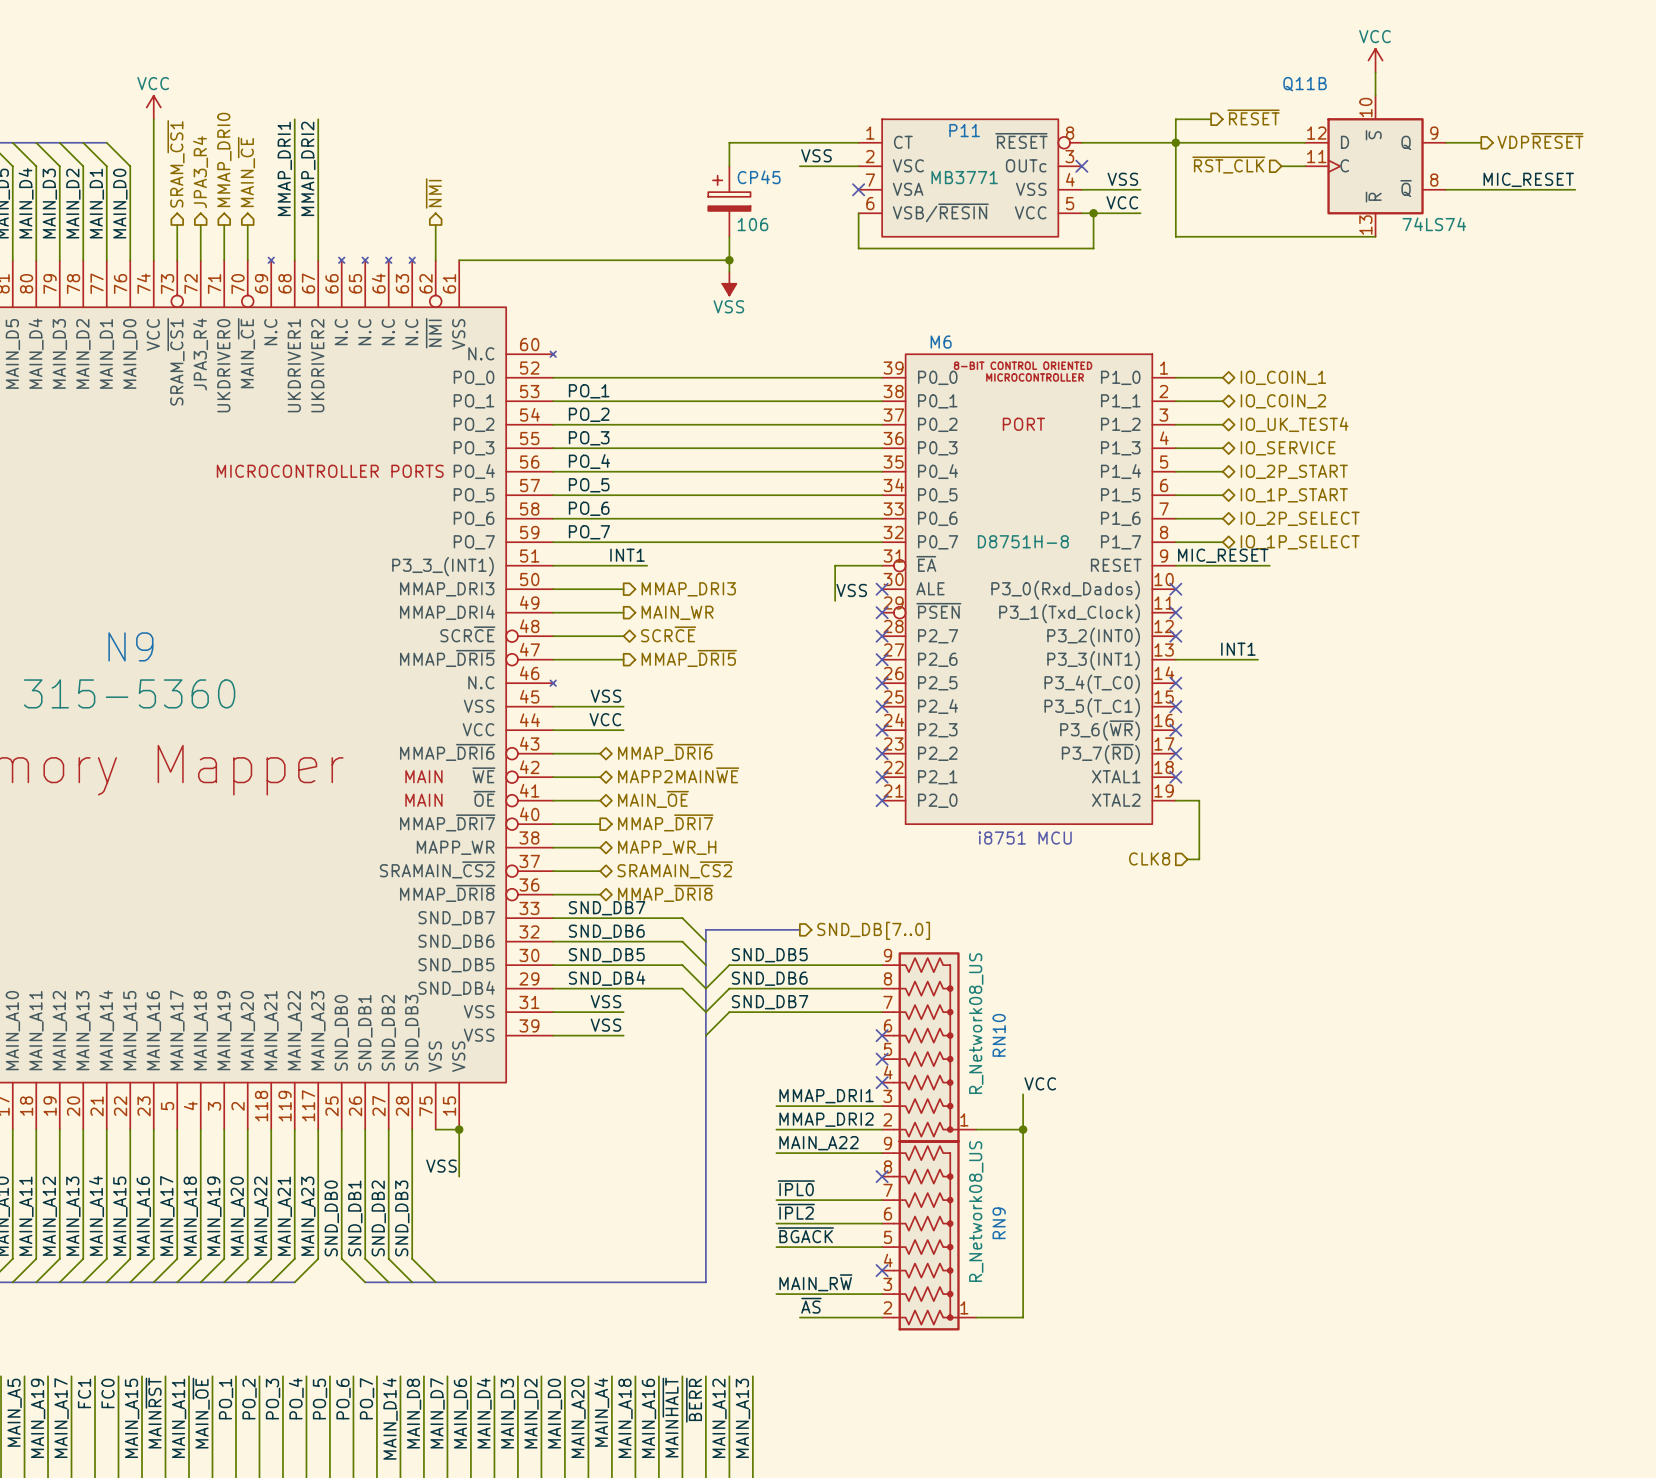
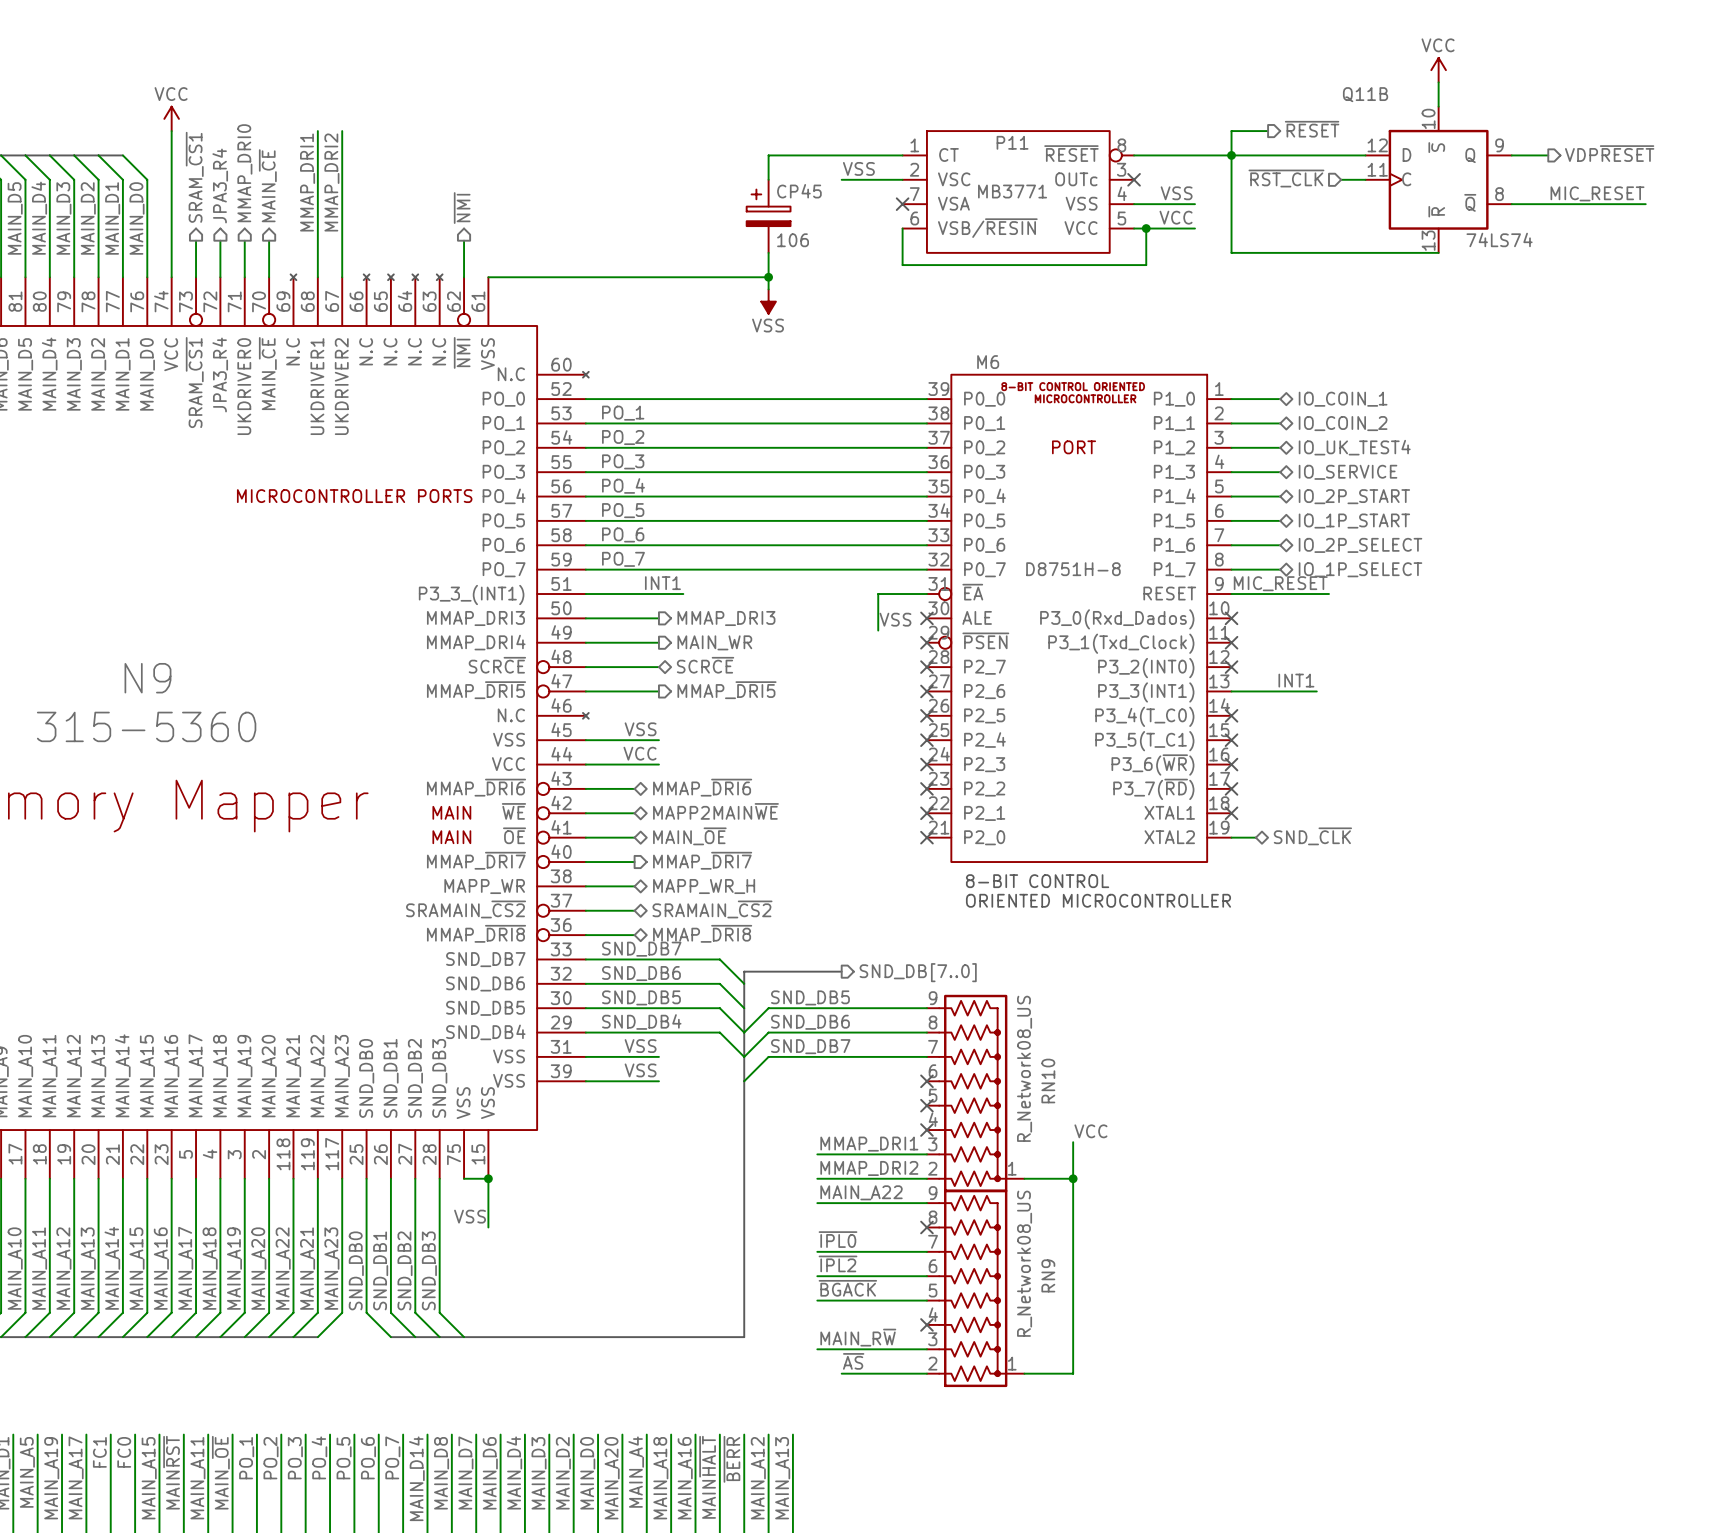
hierarchical label: none -> SND_~{CLK} (1312, 836)
wire: (1199, 800) (1199, 859) (1187, 859) -> none
text: i8751 MCU (1025, 838) -> none
text: none -> 8-BIT CONTROL (1037, 881)
hierarchical label: CLK8 (1149, 858) -> none
text: none -> ORIENTED MICROCONTROLLER (1098, 900)

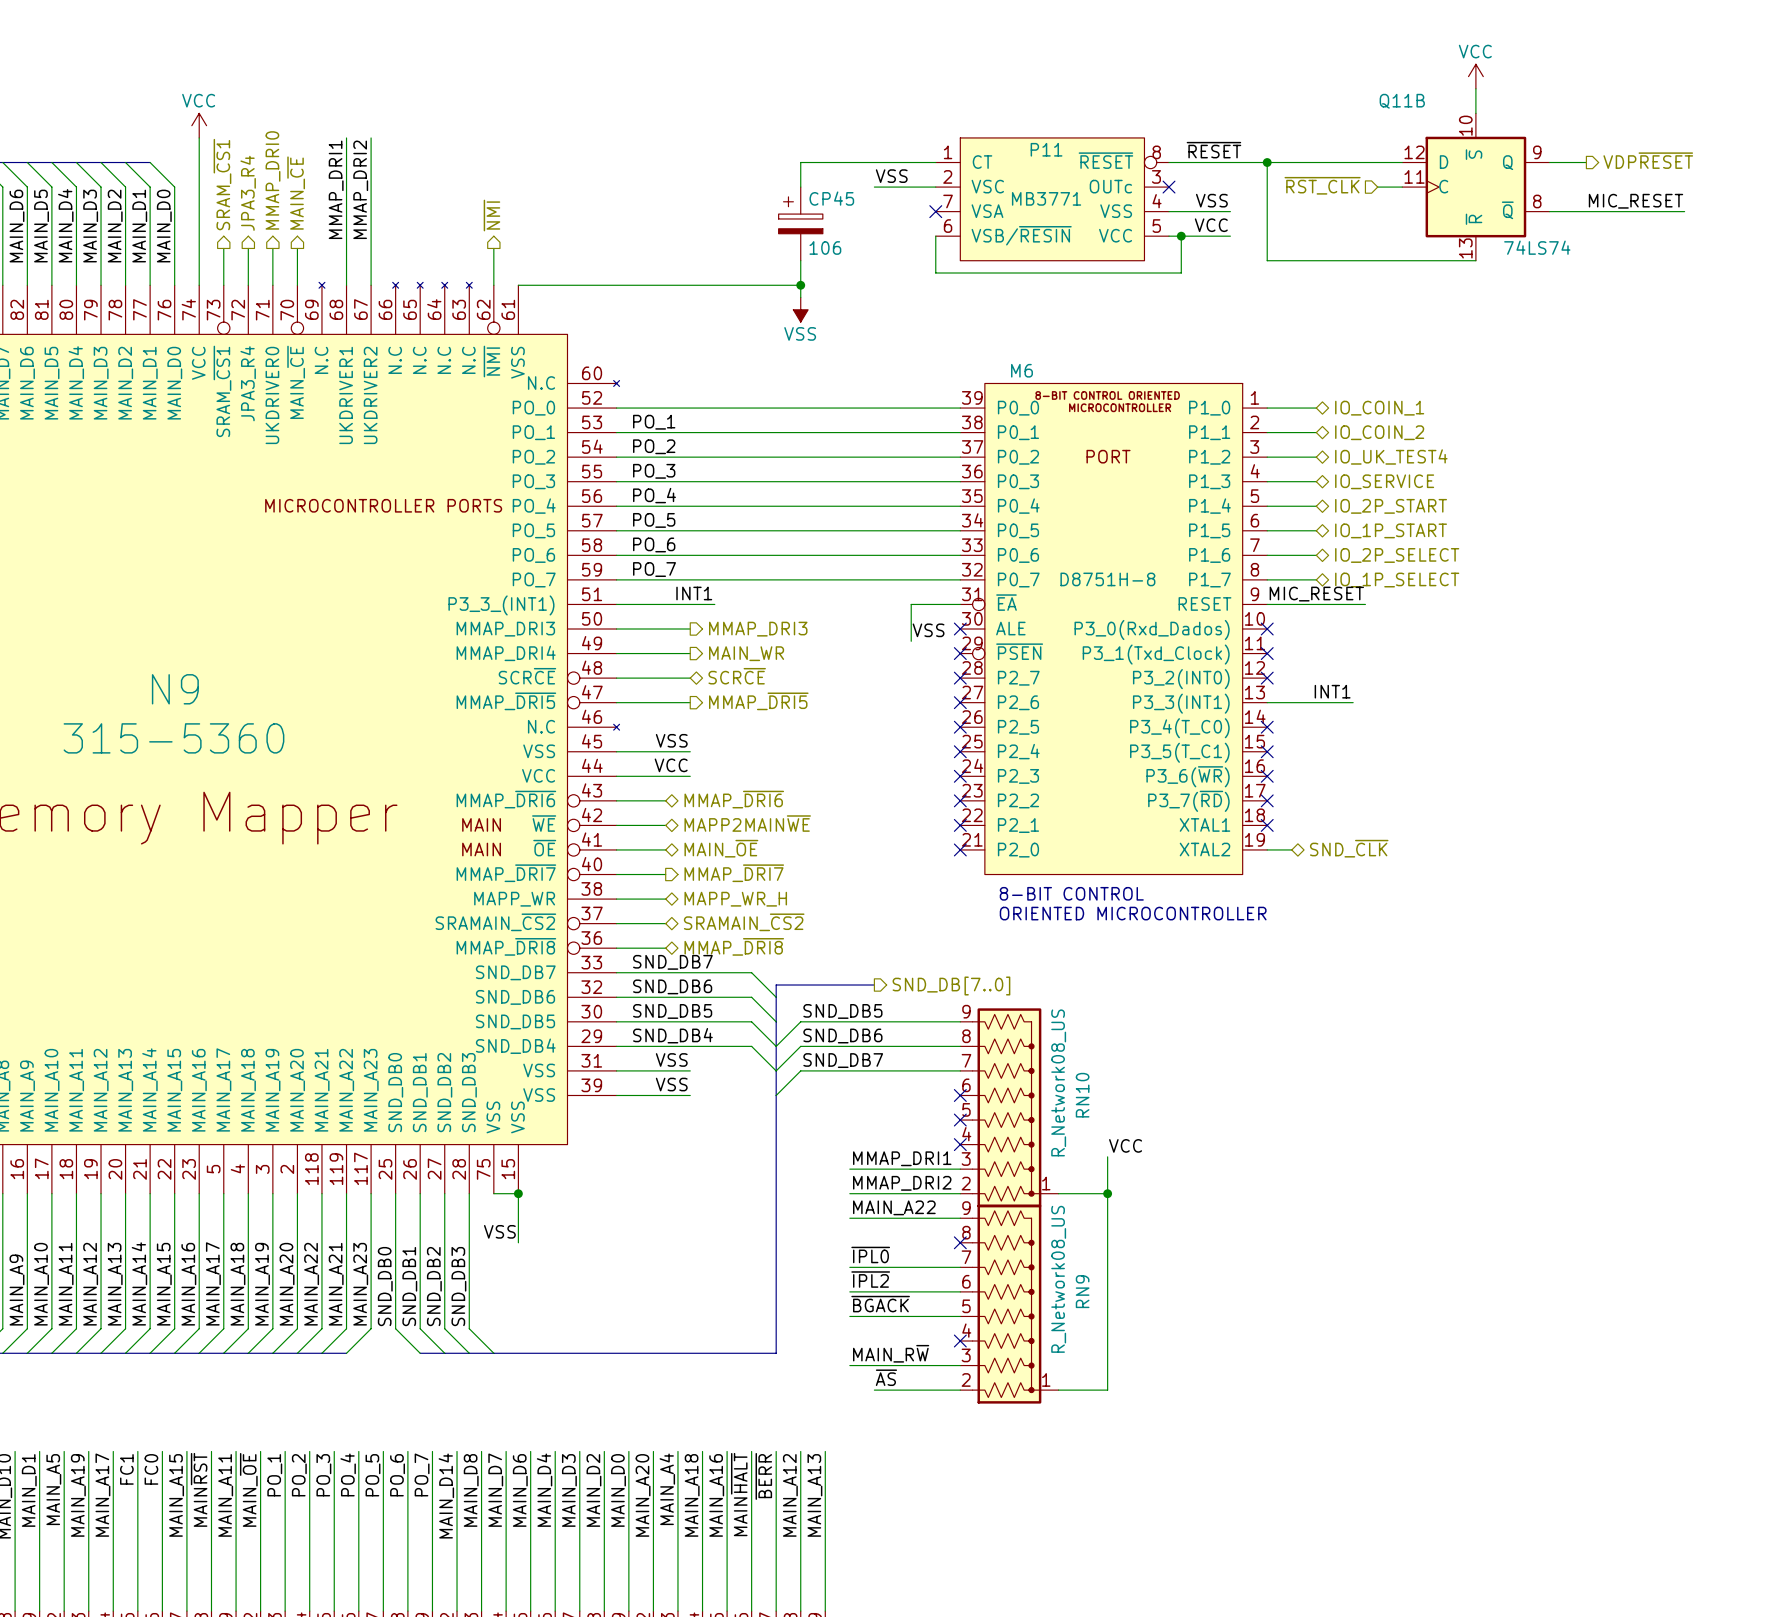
hierarchical label: ~{RESET} (1312, 129) -> none
wire: (1268, 131) (1231, 131) (1231, 155) -> none
label: none -> ~{RESET} (1213, 150)

